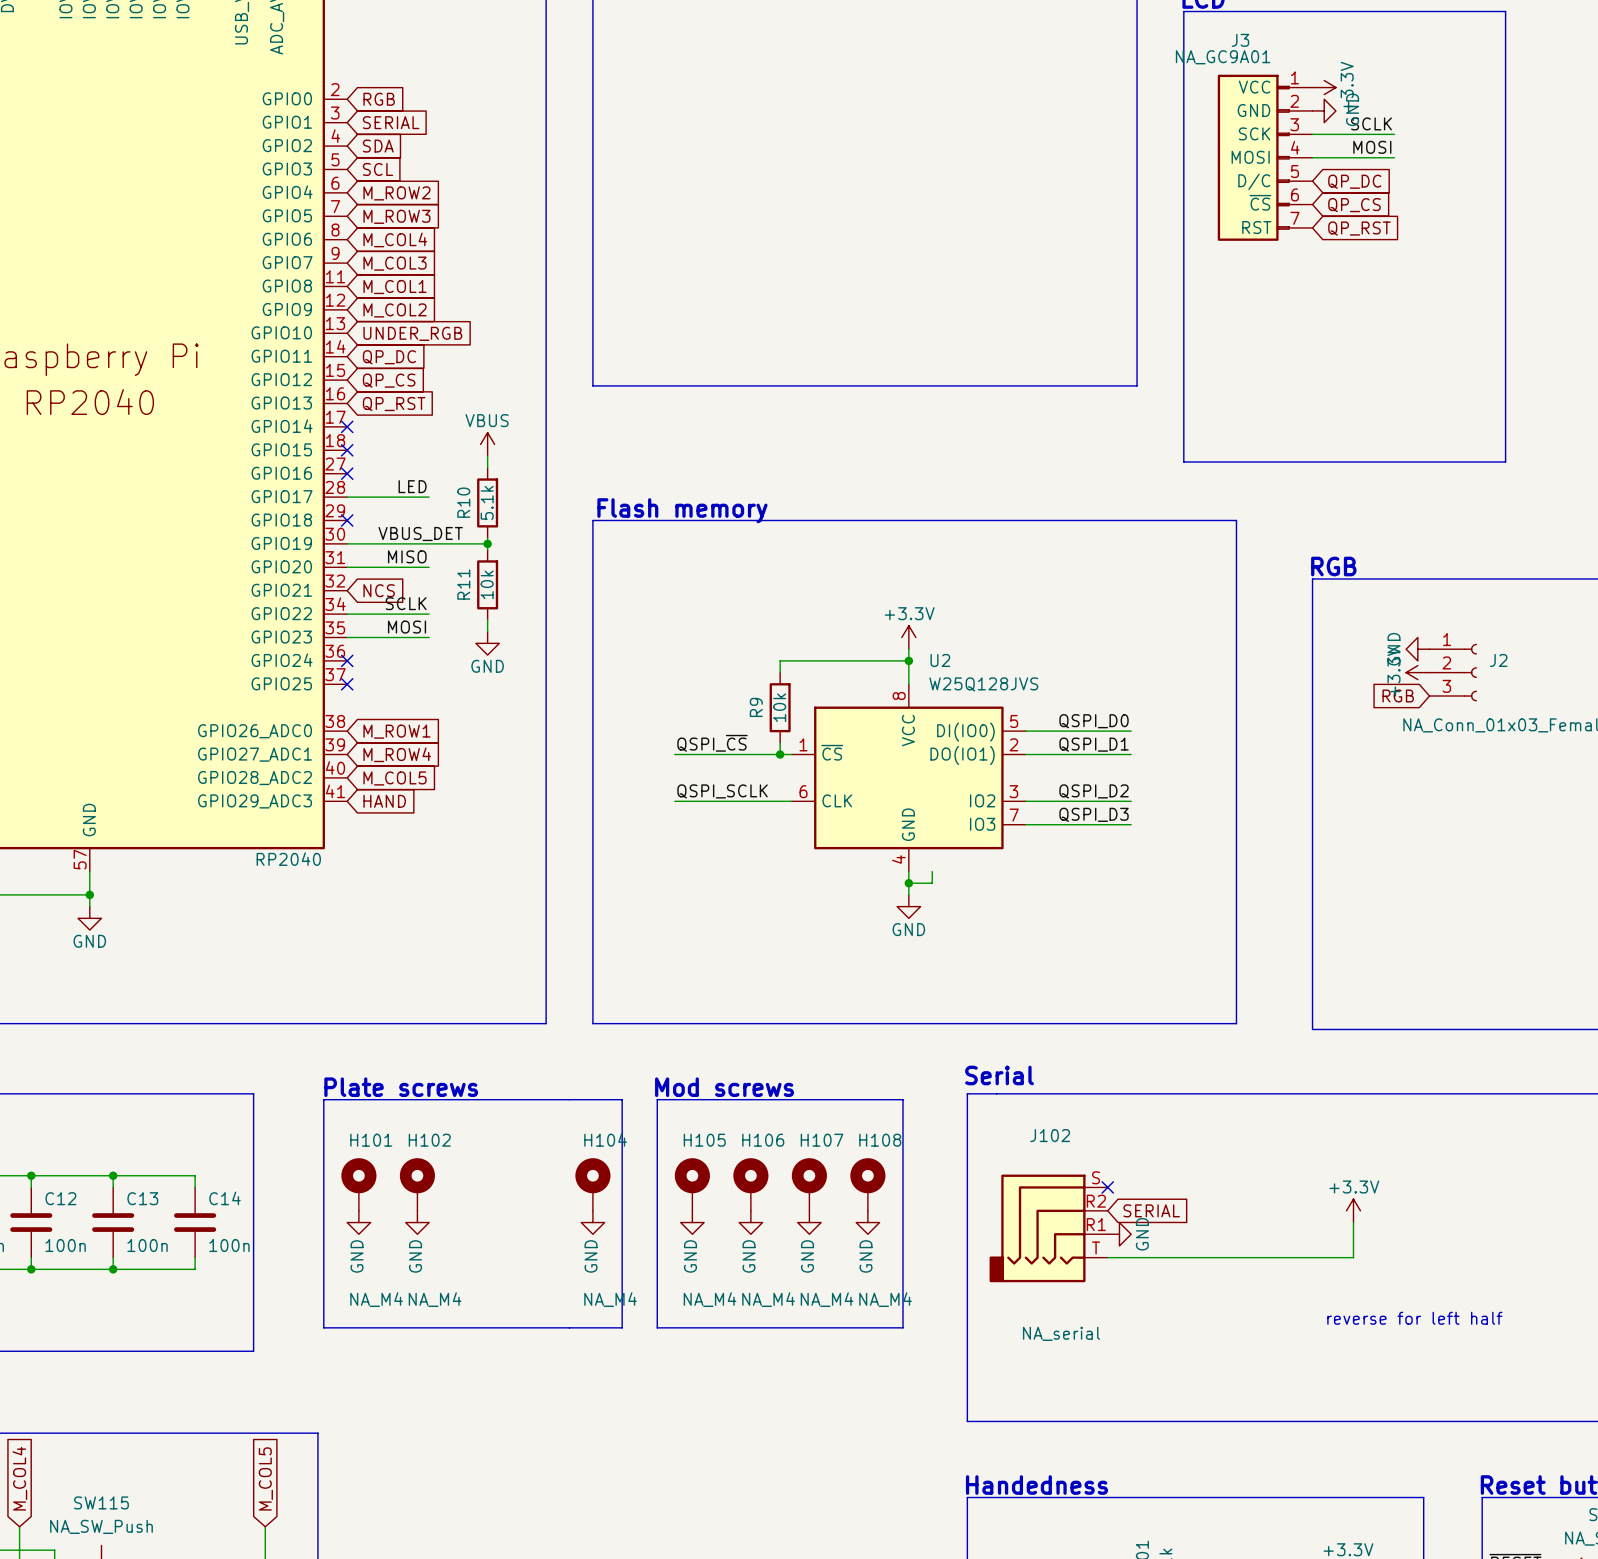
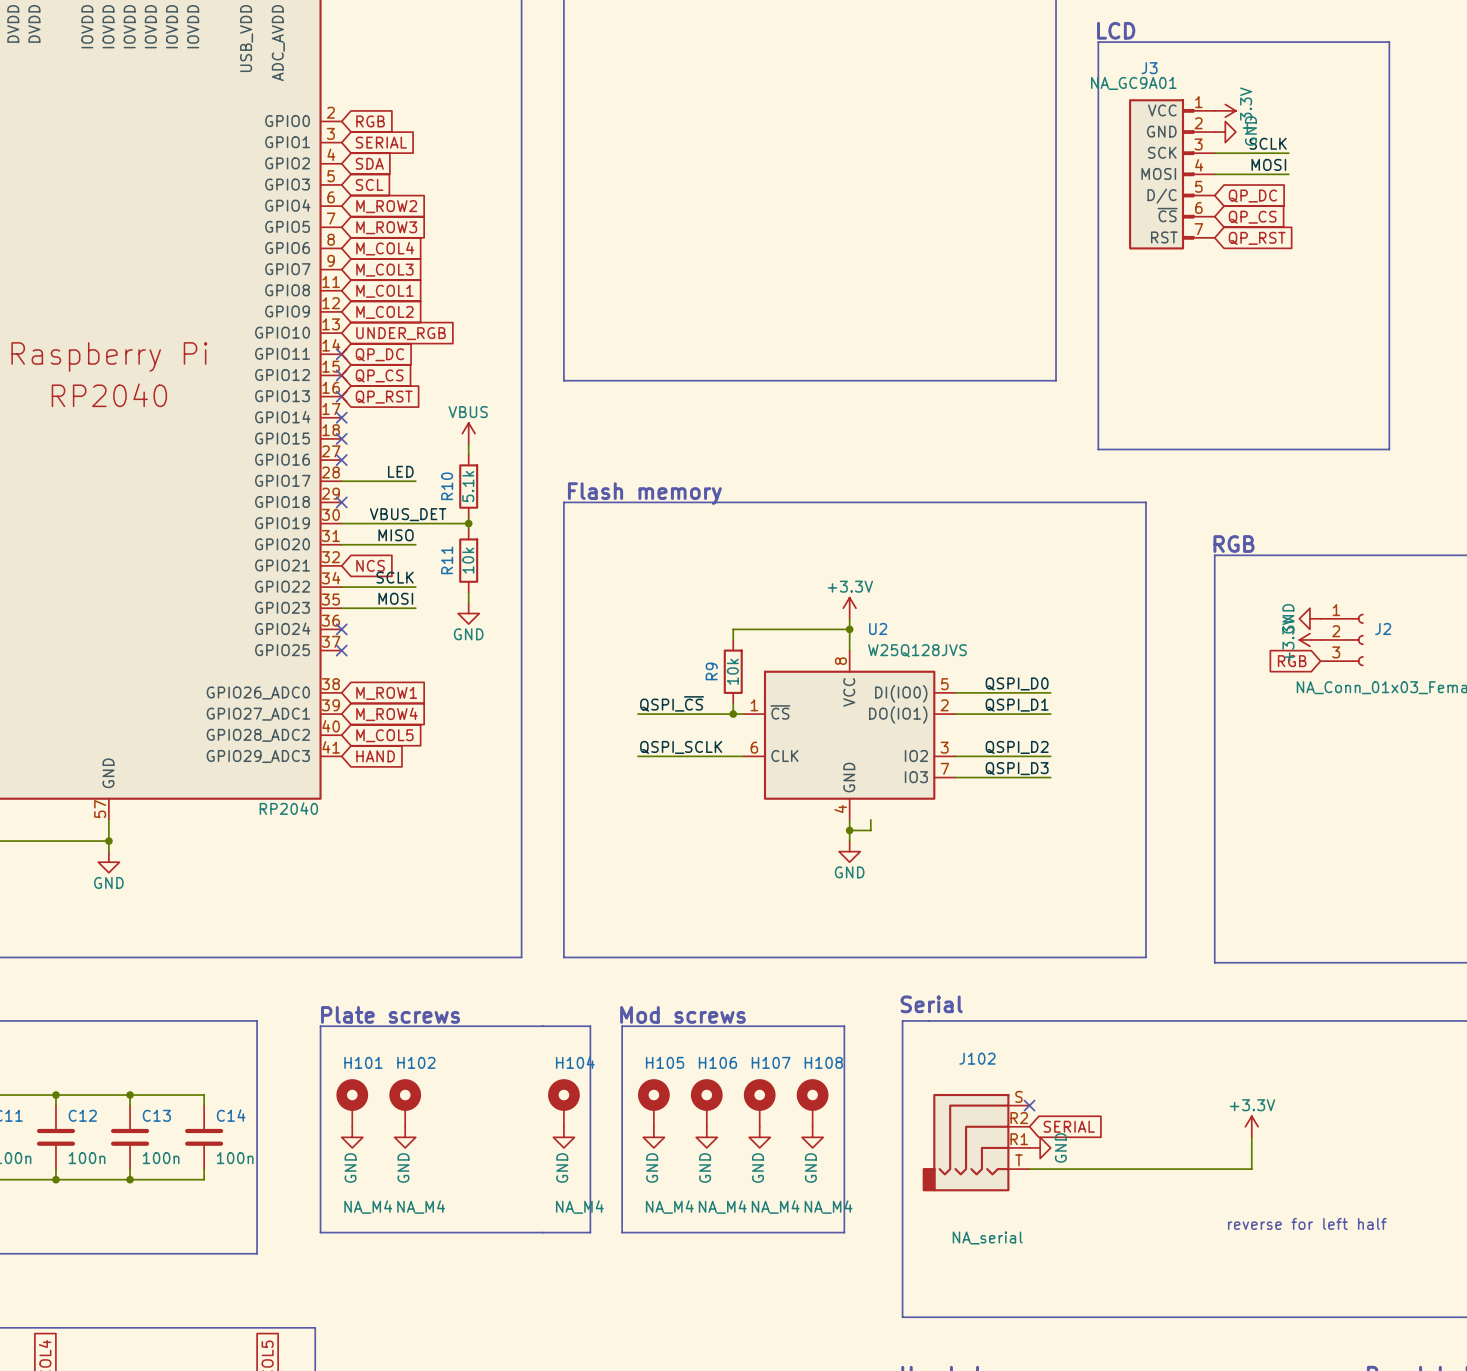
no-connect mark: none -> (341, 354)
no-connect mark: none -> (341, 375)
no-connect mark: none -> (341, 396)

